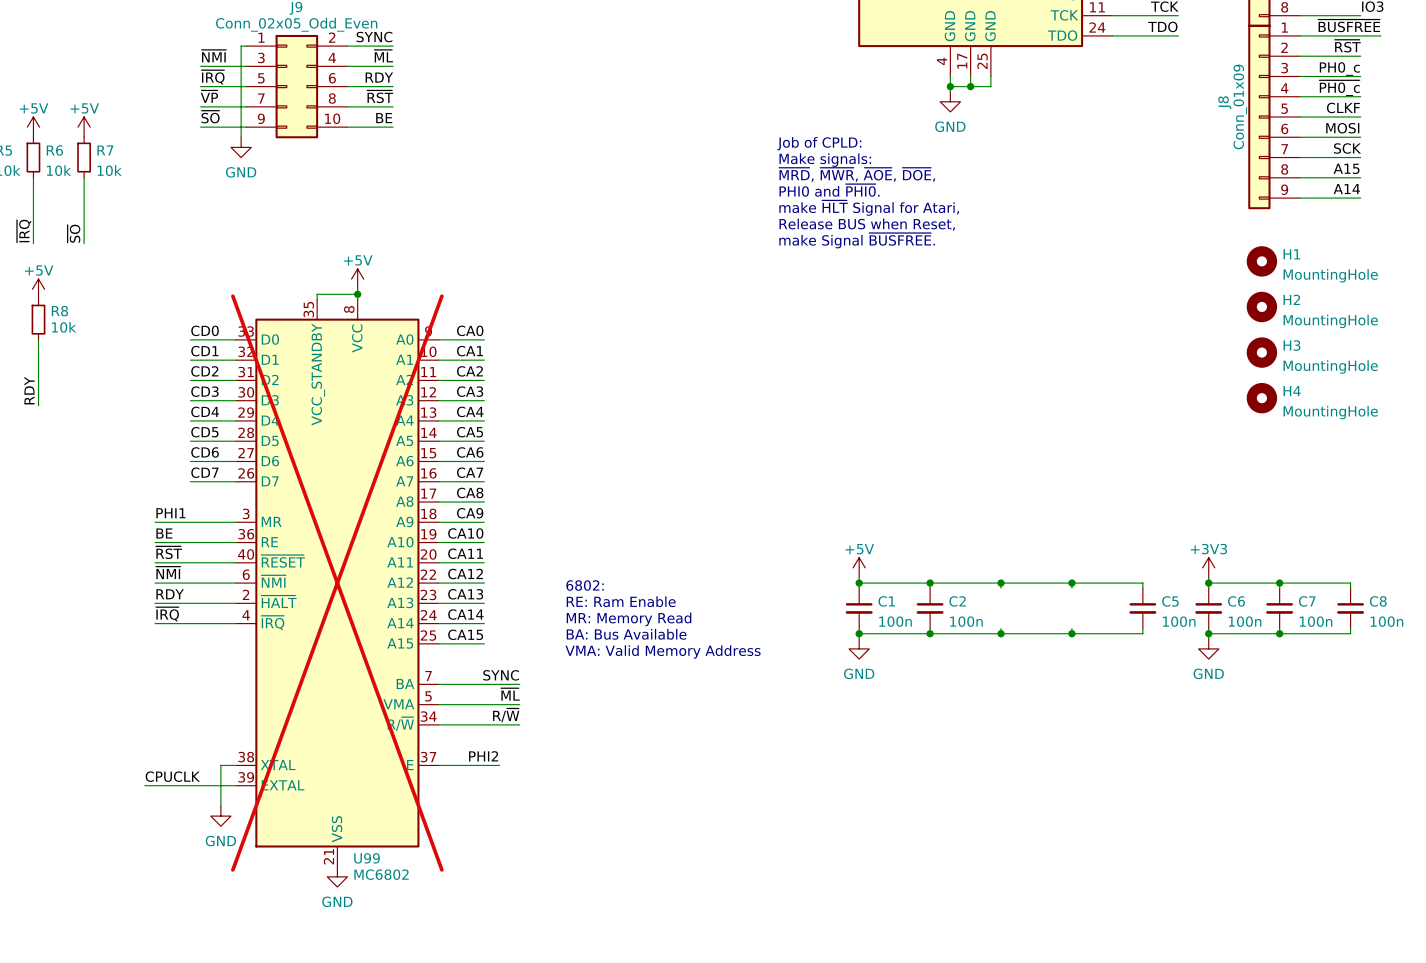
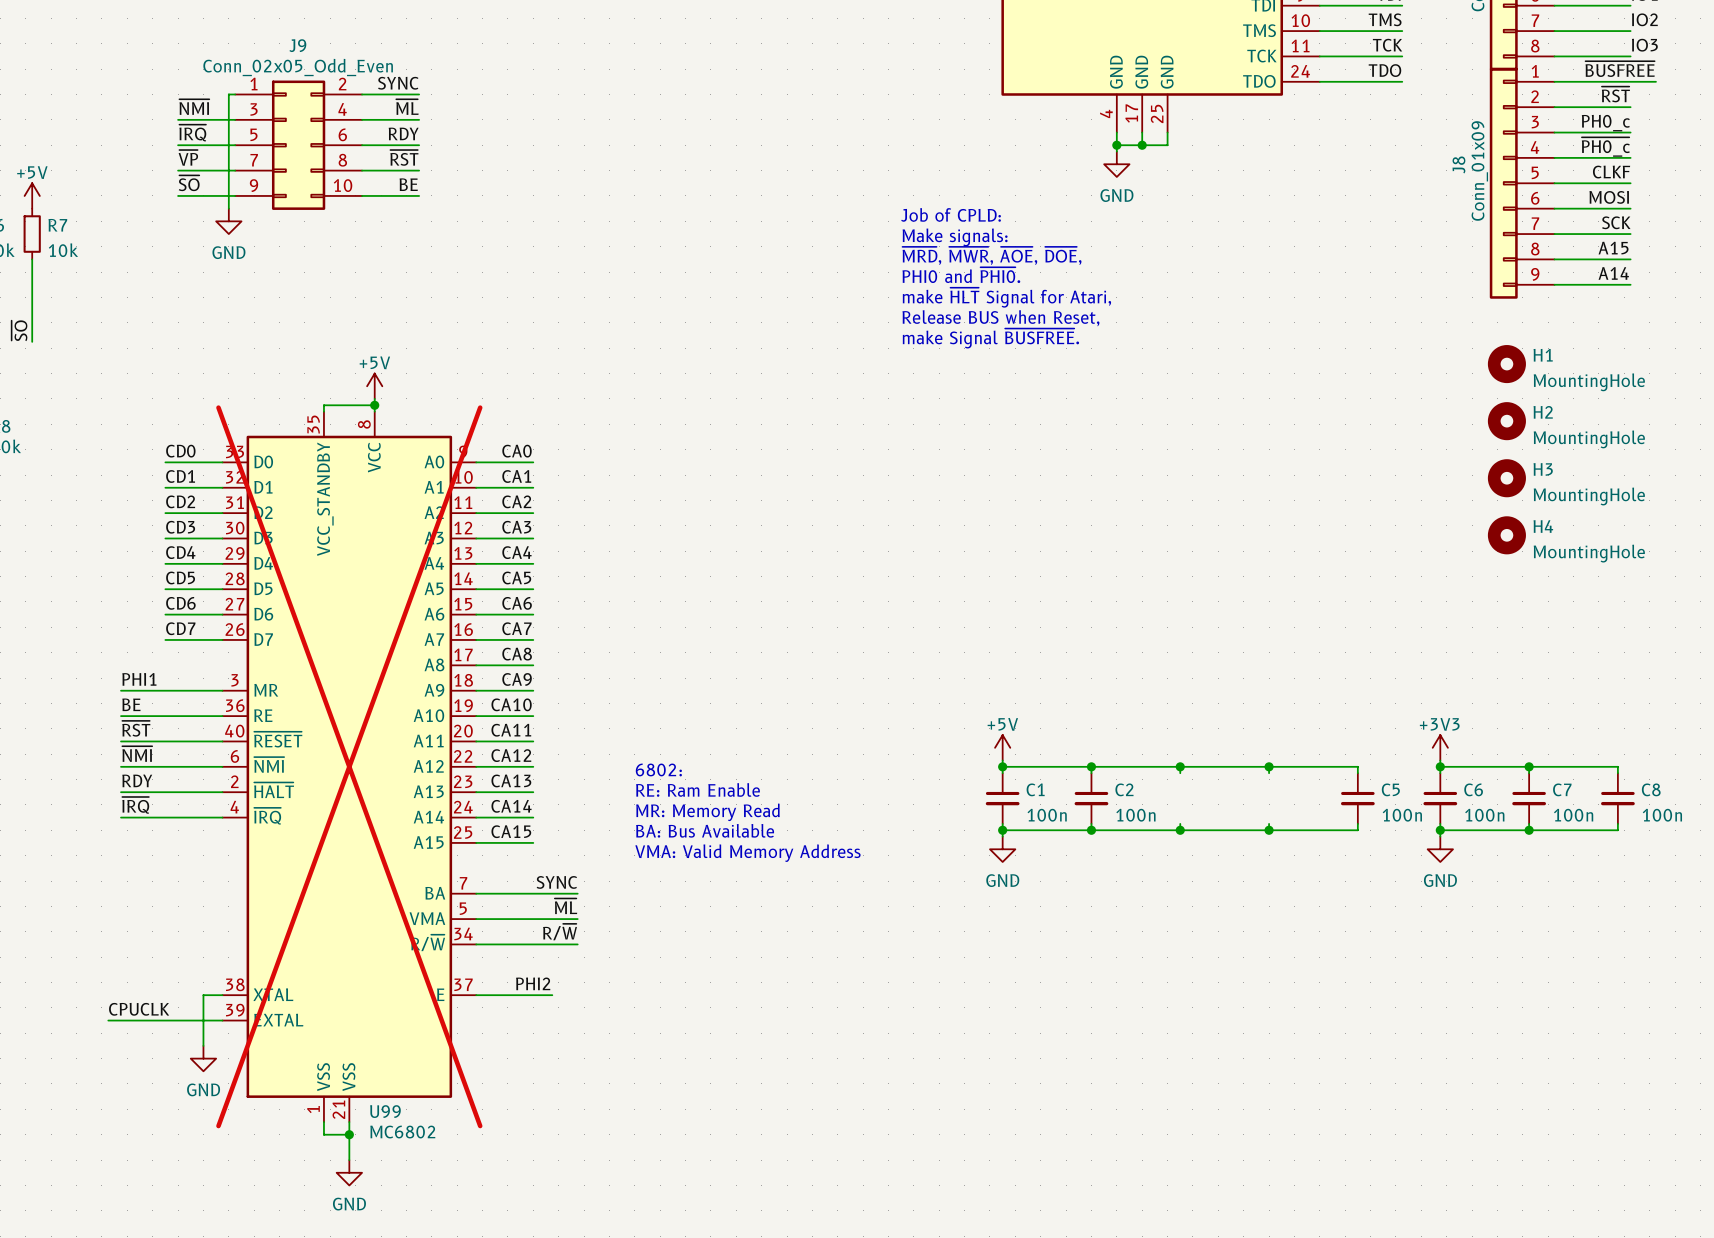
U99 symbol: [236, 299, 439, 867] -> [222, 411, 477, 1123]
wire: none -> (323, 1122) (323, 1134) (349, 1134)
wire: none -> (349, 1122) (349, 1160)
power symbol position: GND (337, 876) -> GND (349, 1172)
junction: none -> (349, 1134)

